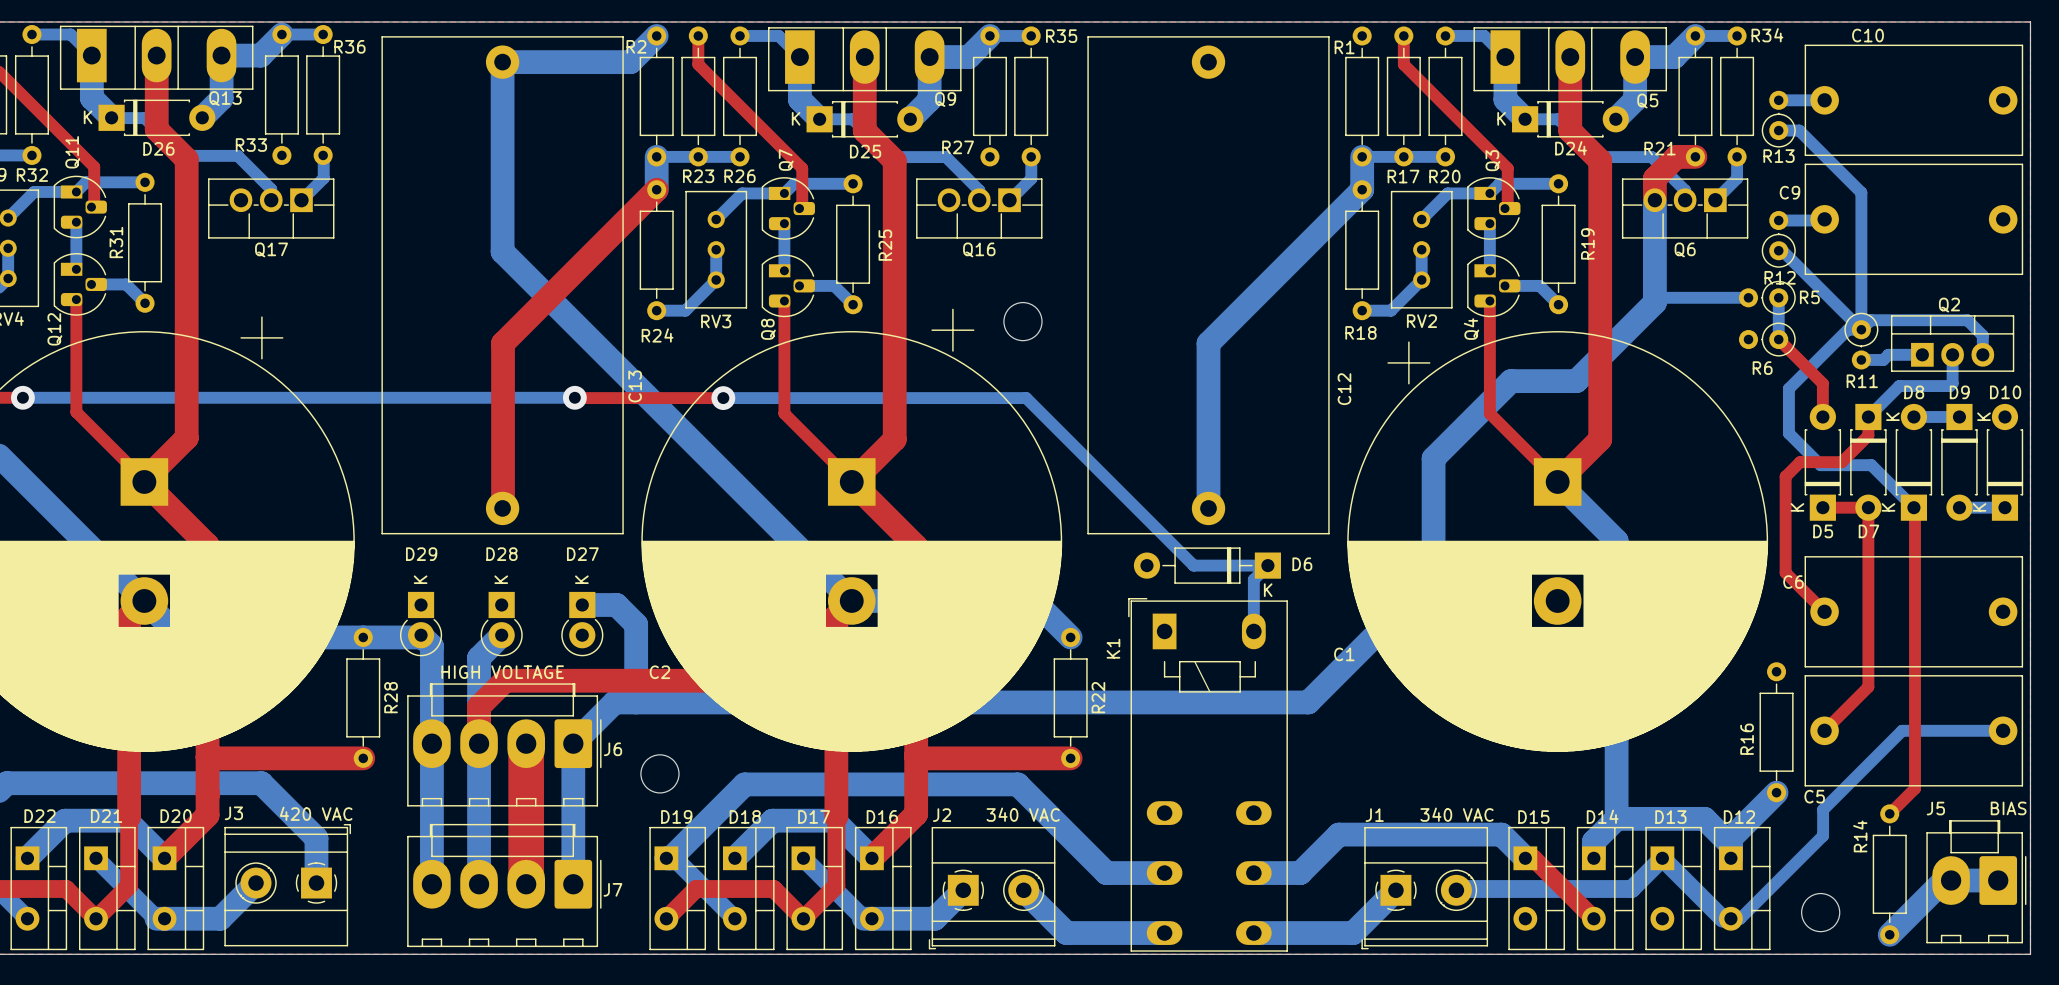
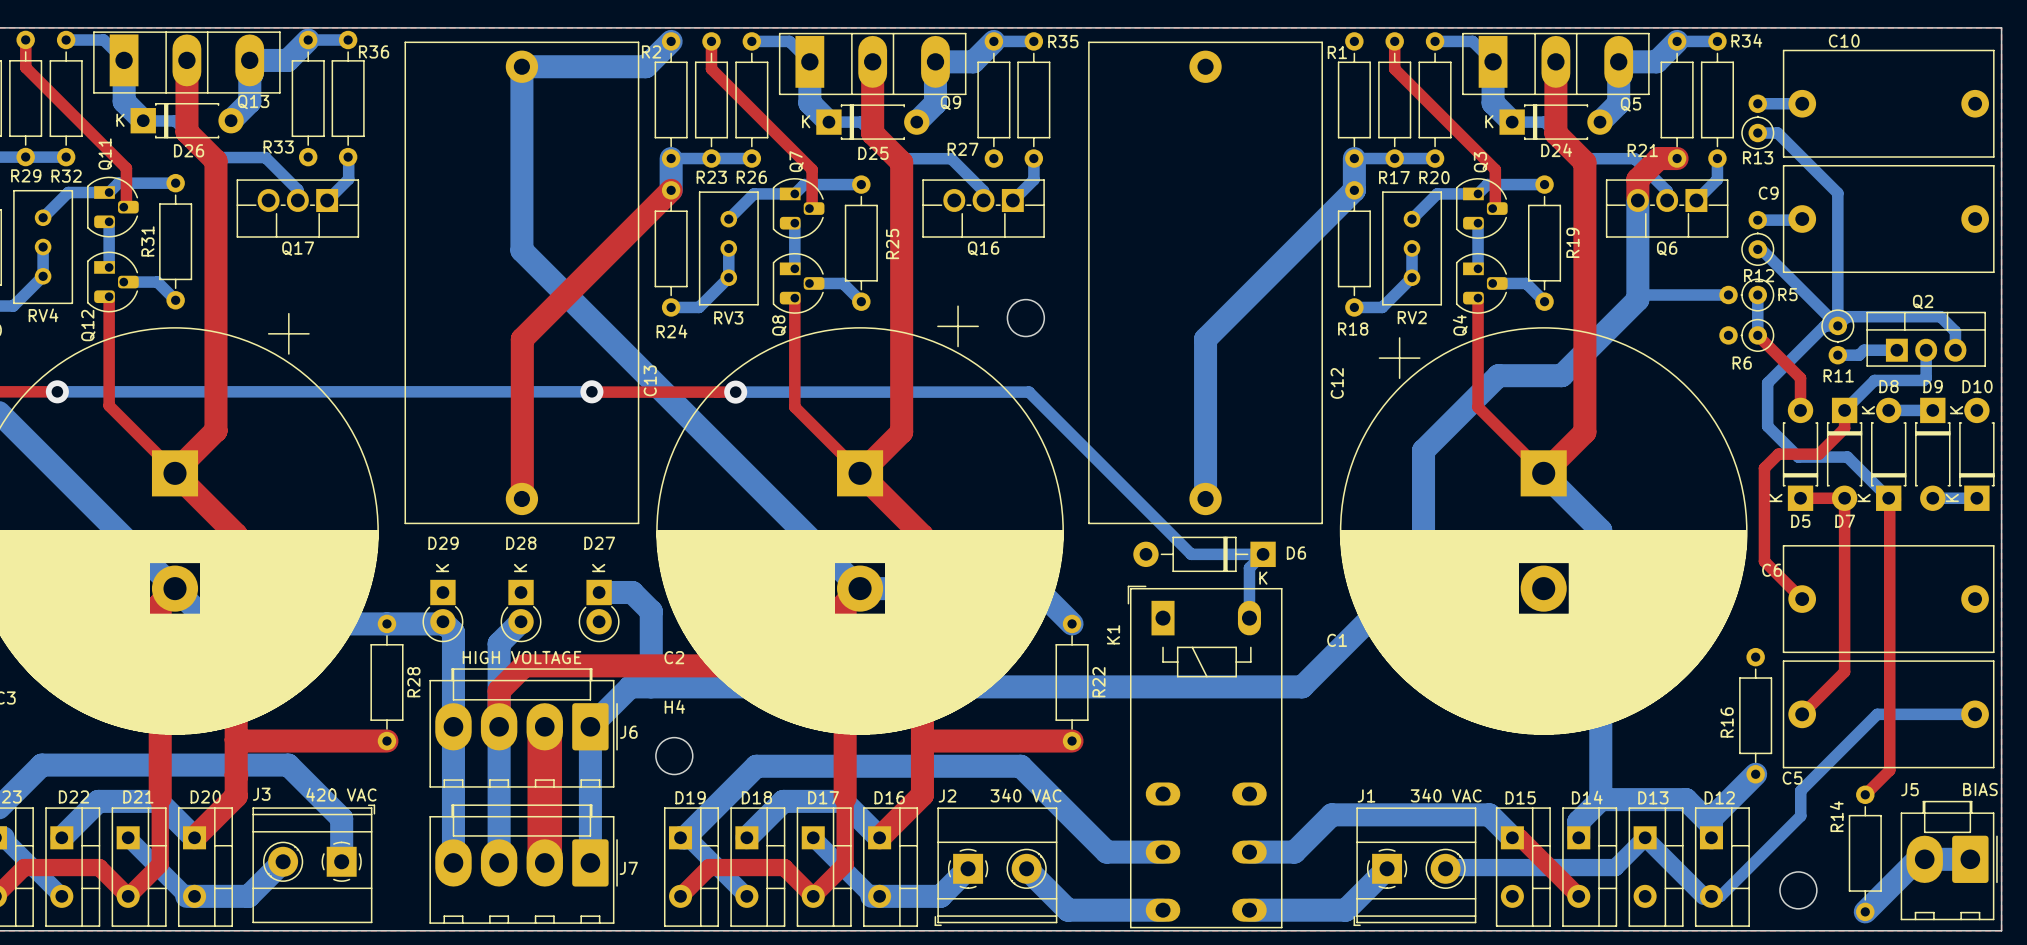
H4 name: none -> H4 (674, 706)

